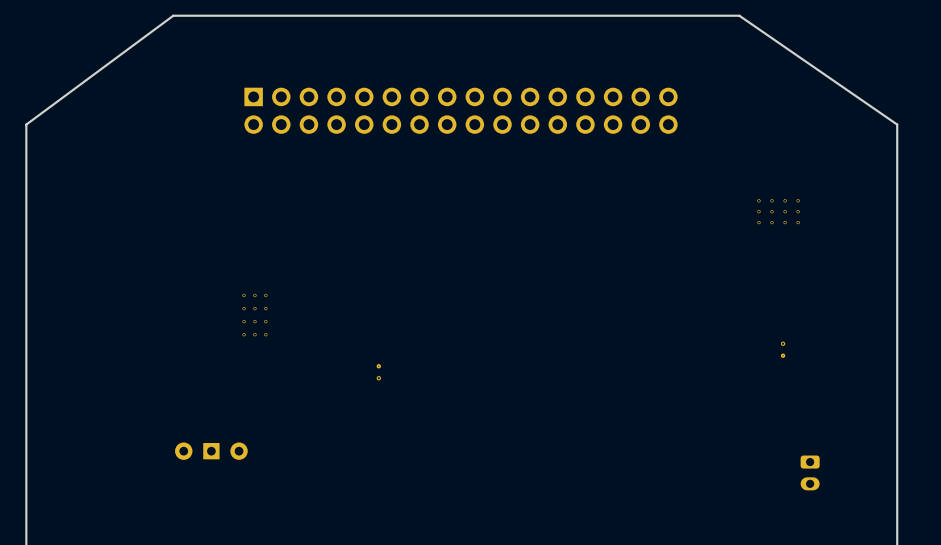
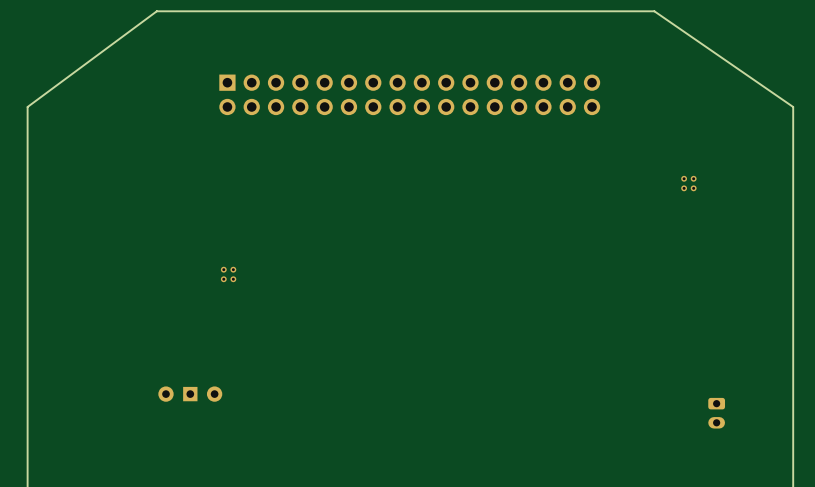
part footprint: [757, 199, 800, 225] -> [681, 175, 697, 192]
part footprint: [242, 293, 268, 337] -> [220, 266, 237, 283]
part: (783, 349) -> none
part: (378, 372) -> none

